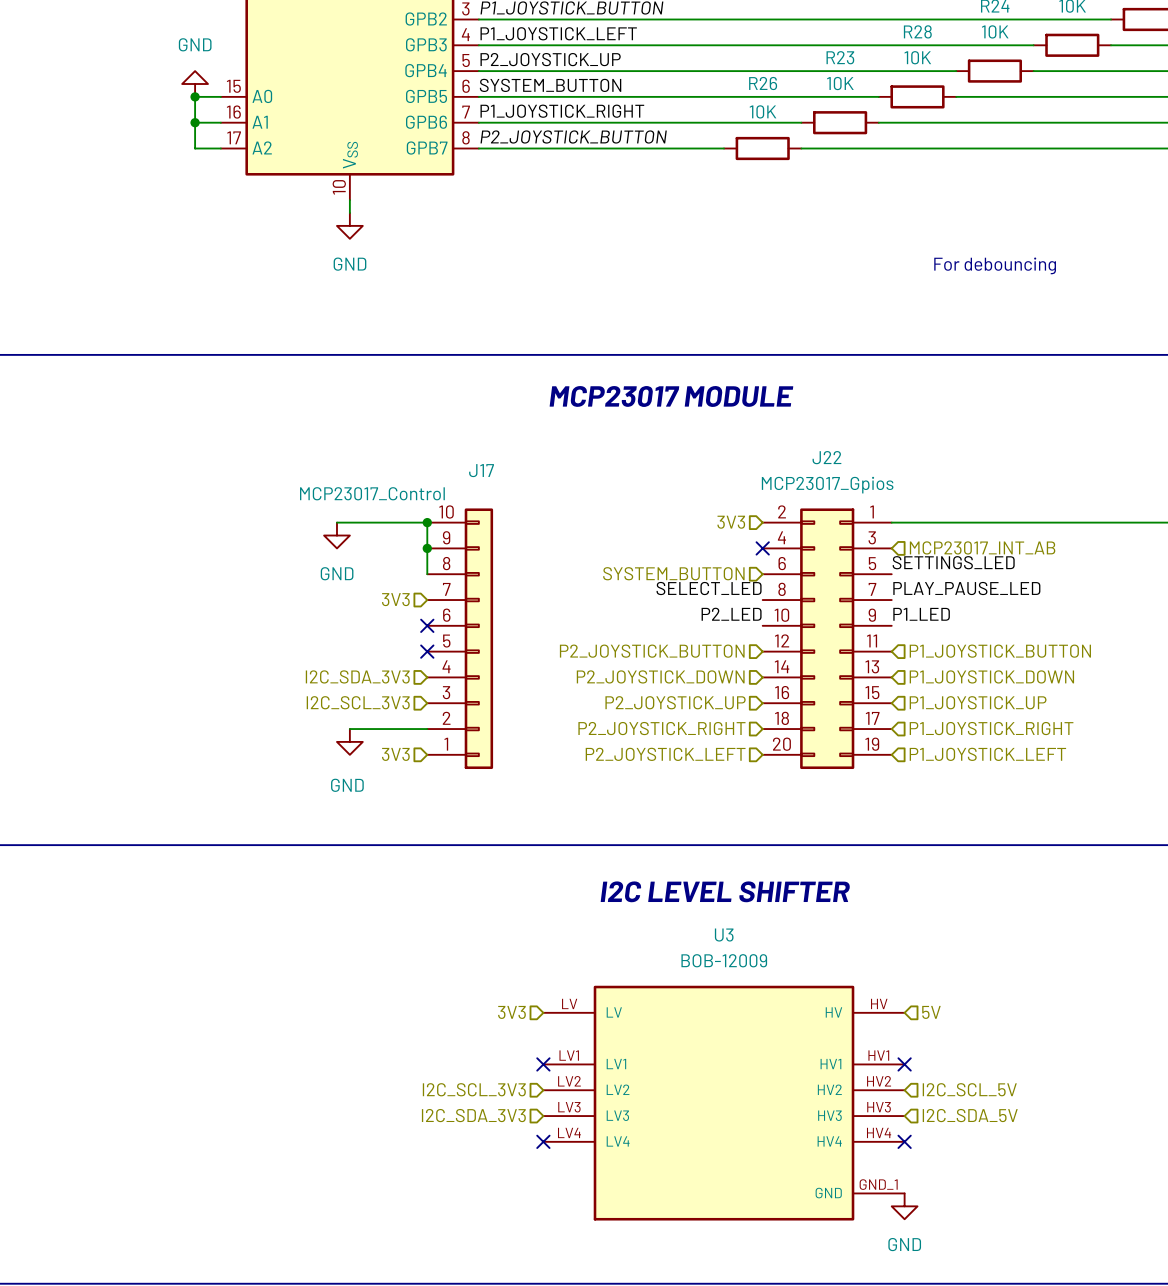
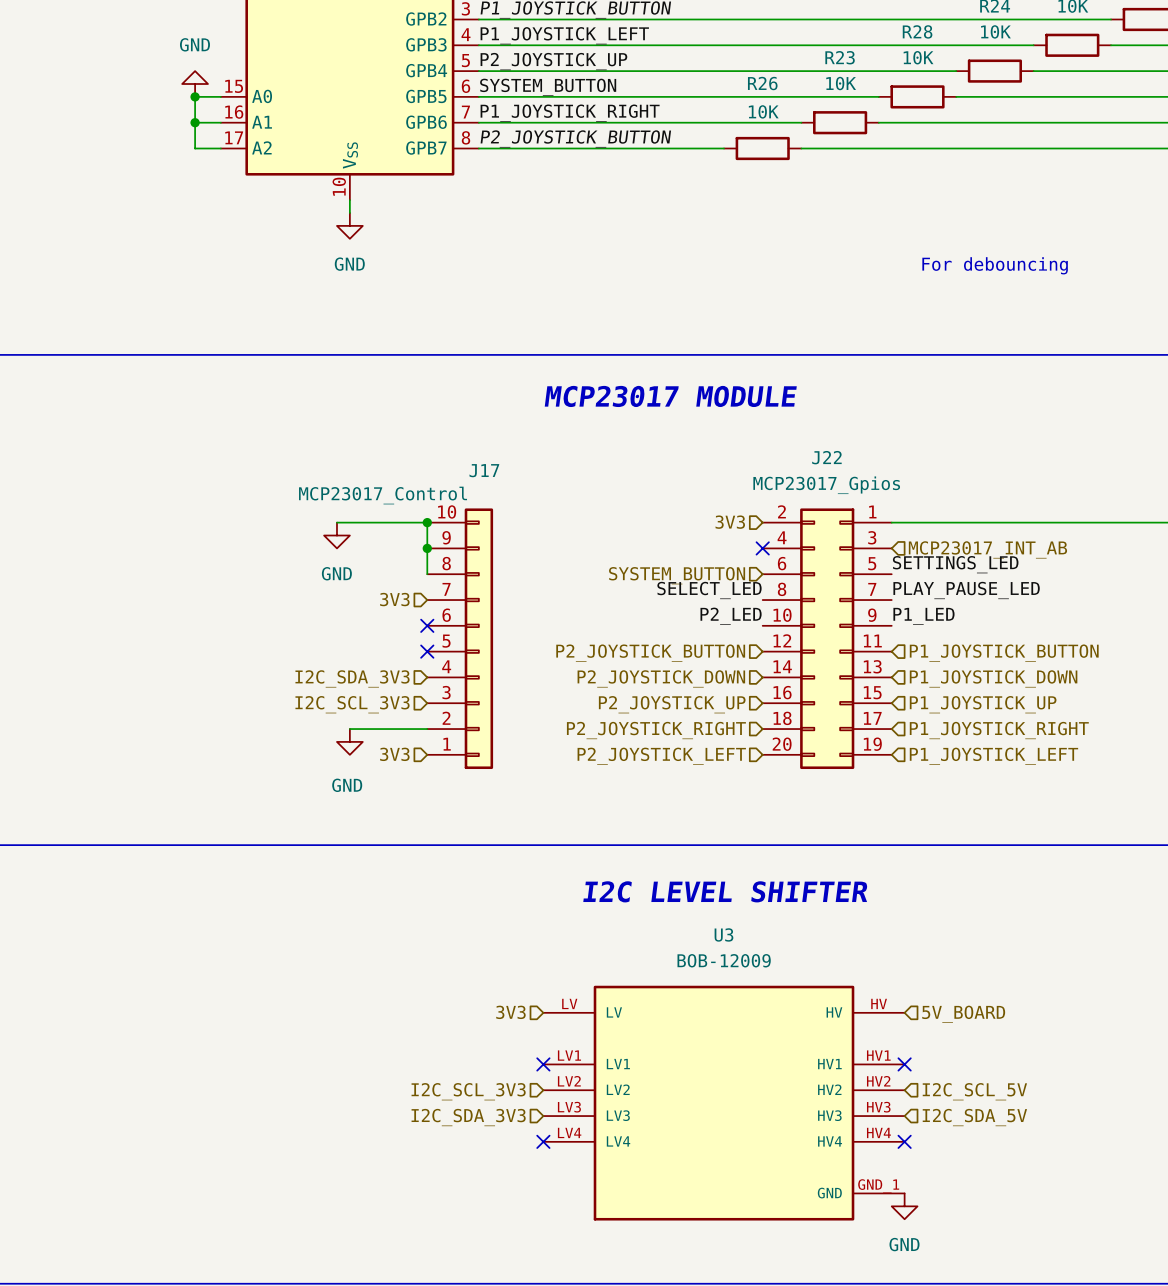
hierarchical label: 5V (931, 1012) -> 5V_BOARD (963, 1014)

